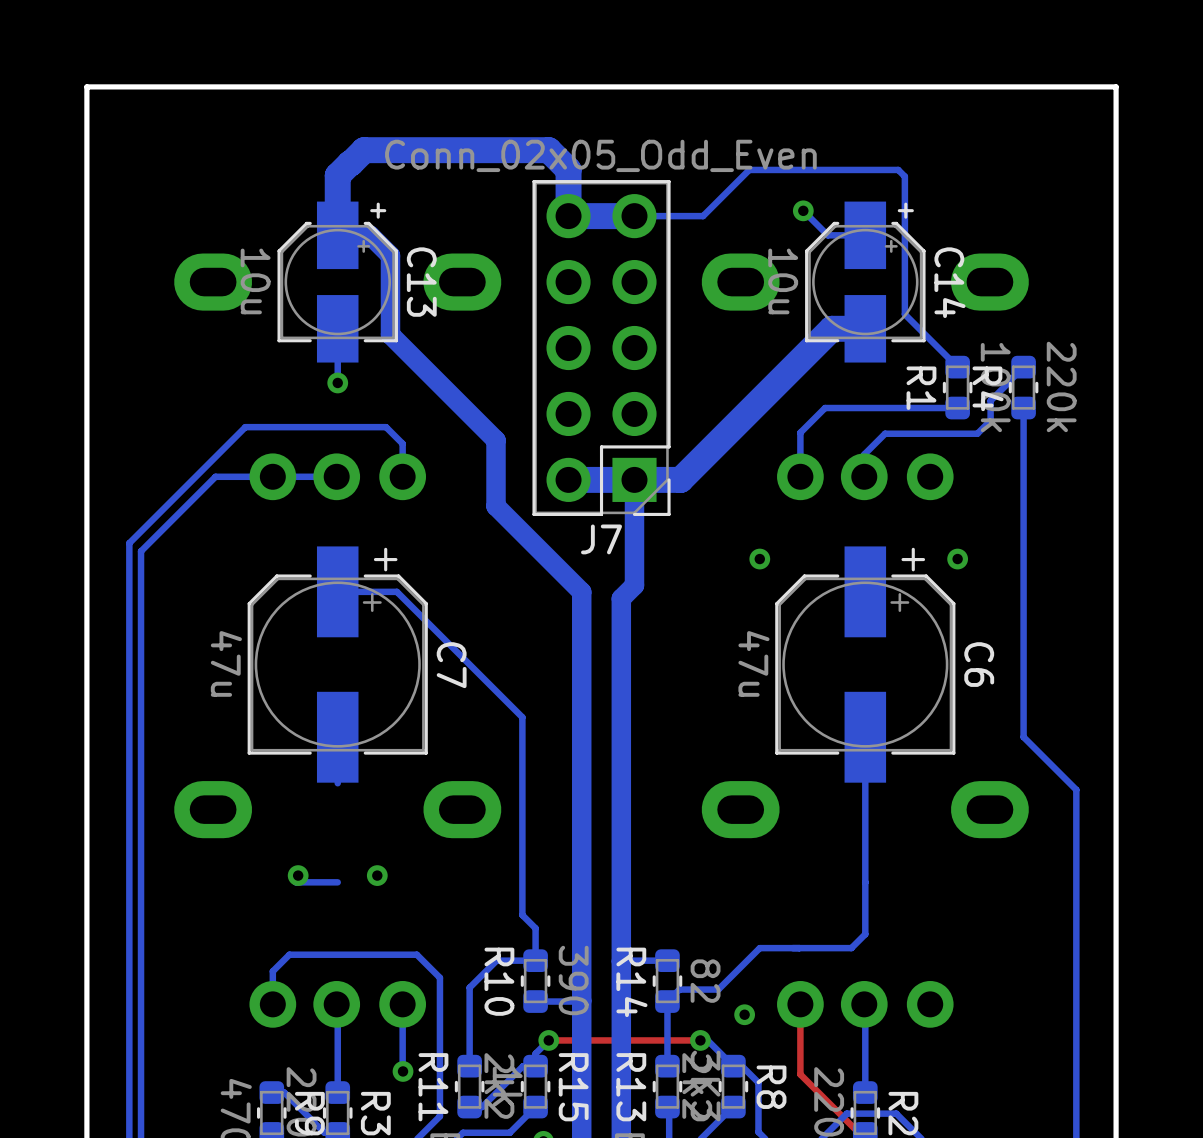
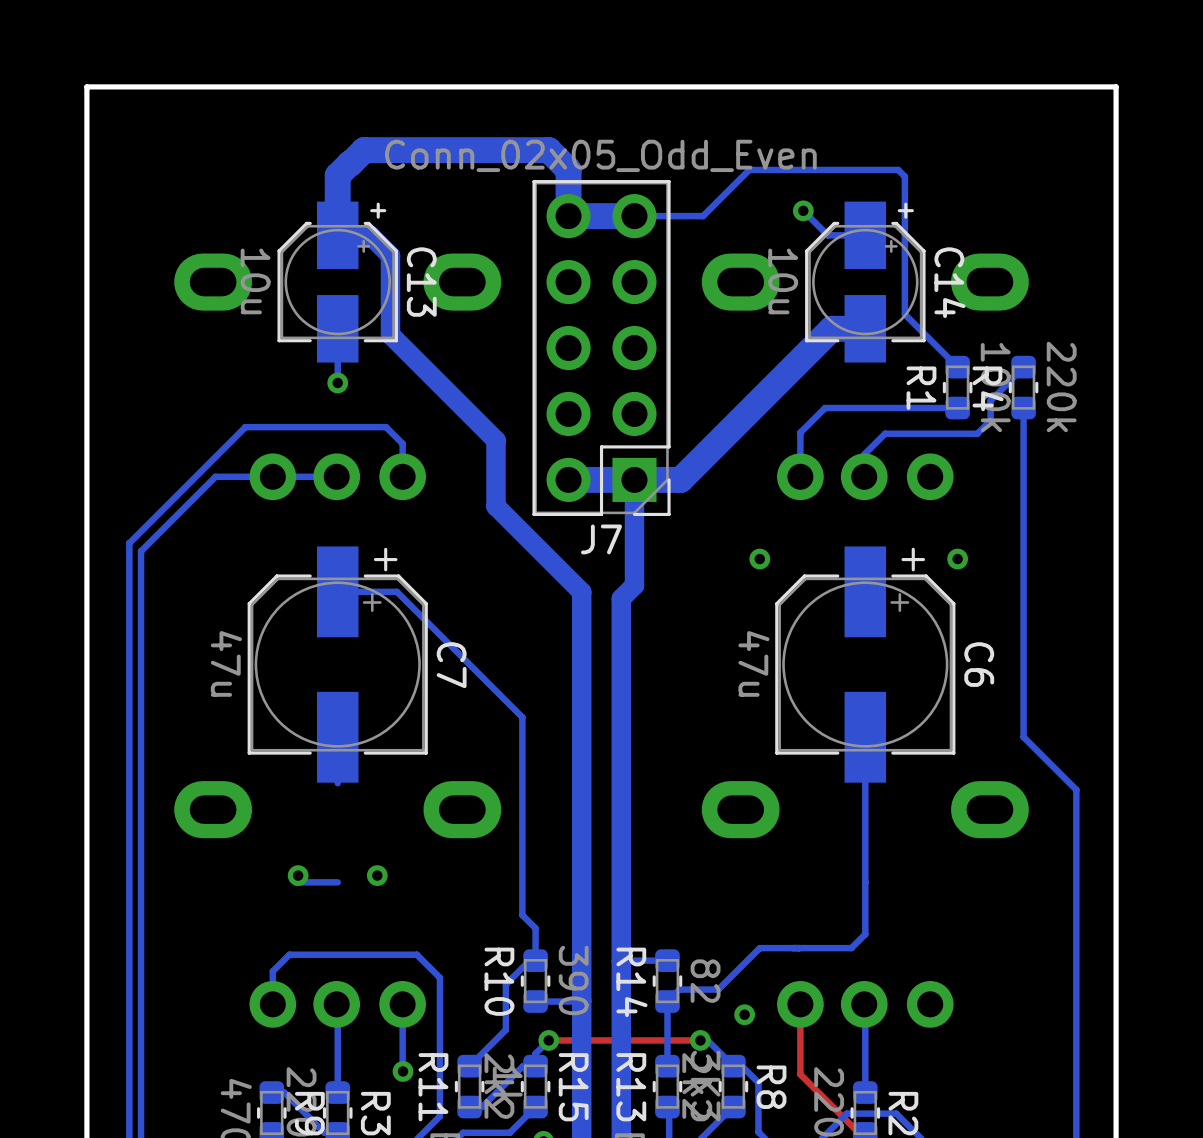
bottom track: (529, 960) (496, 960) (469, 987) (469, 1066) -> (529, 960) (505, 984) (505, 1029) (469, 1066)

